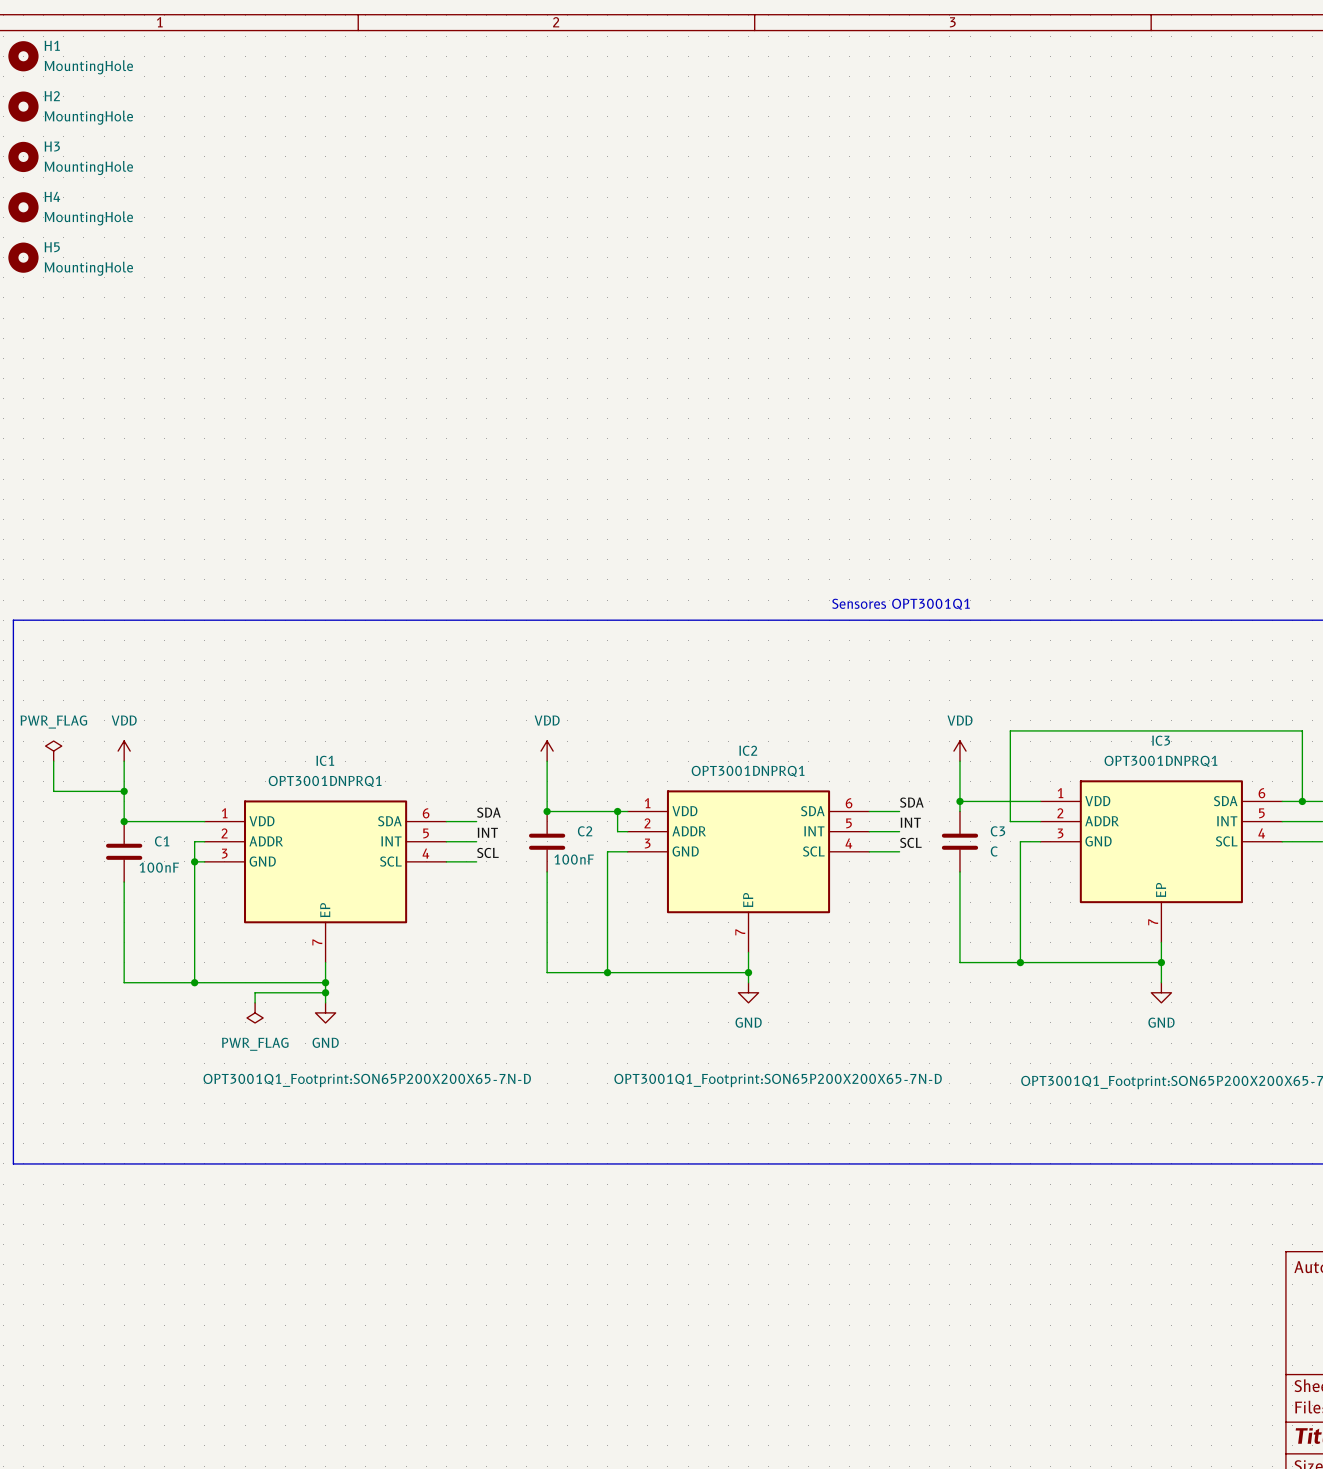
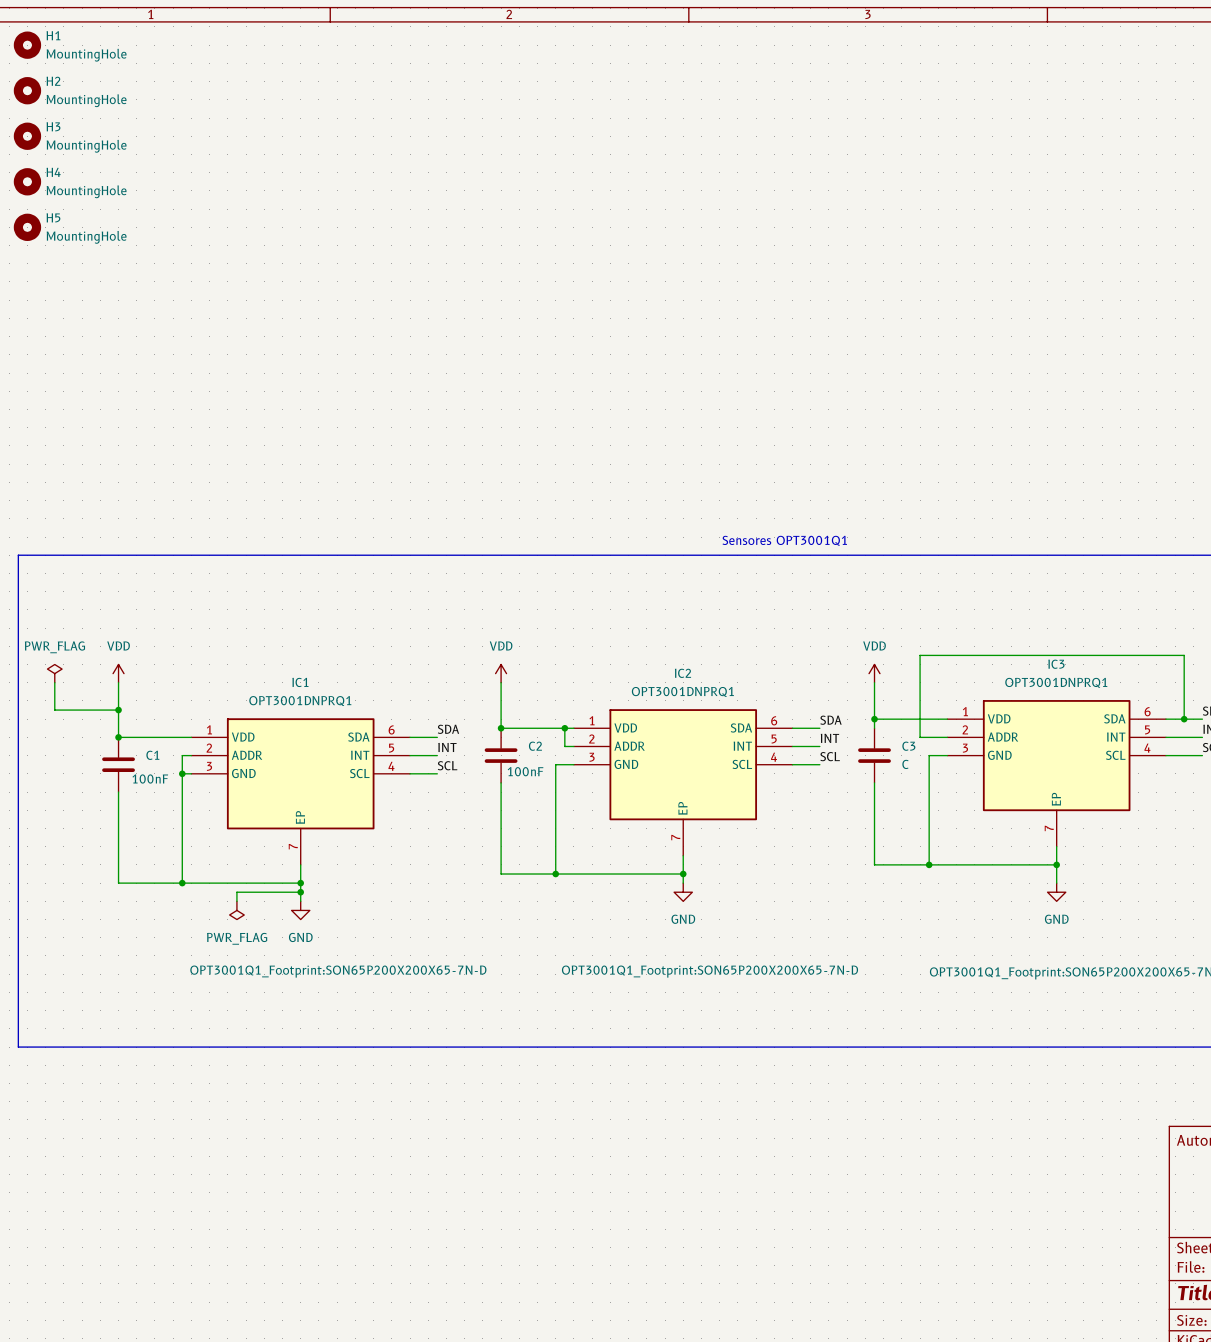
text position: Sensores OPT3001Q1 (901, 604) -> Sensores OPT3001Q1 (784, 540)

